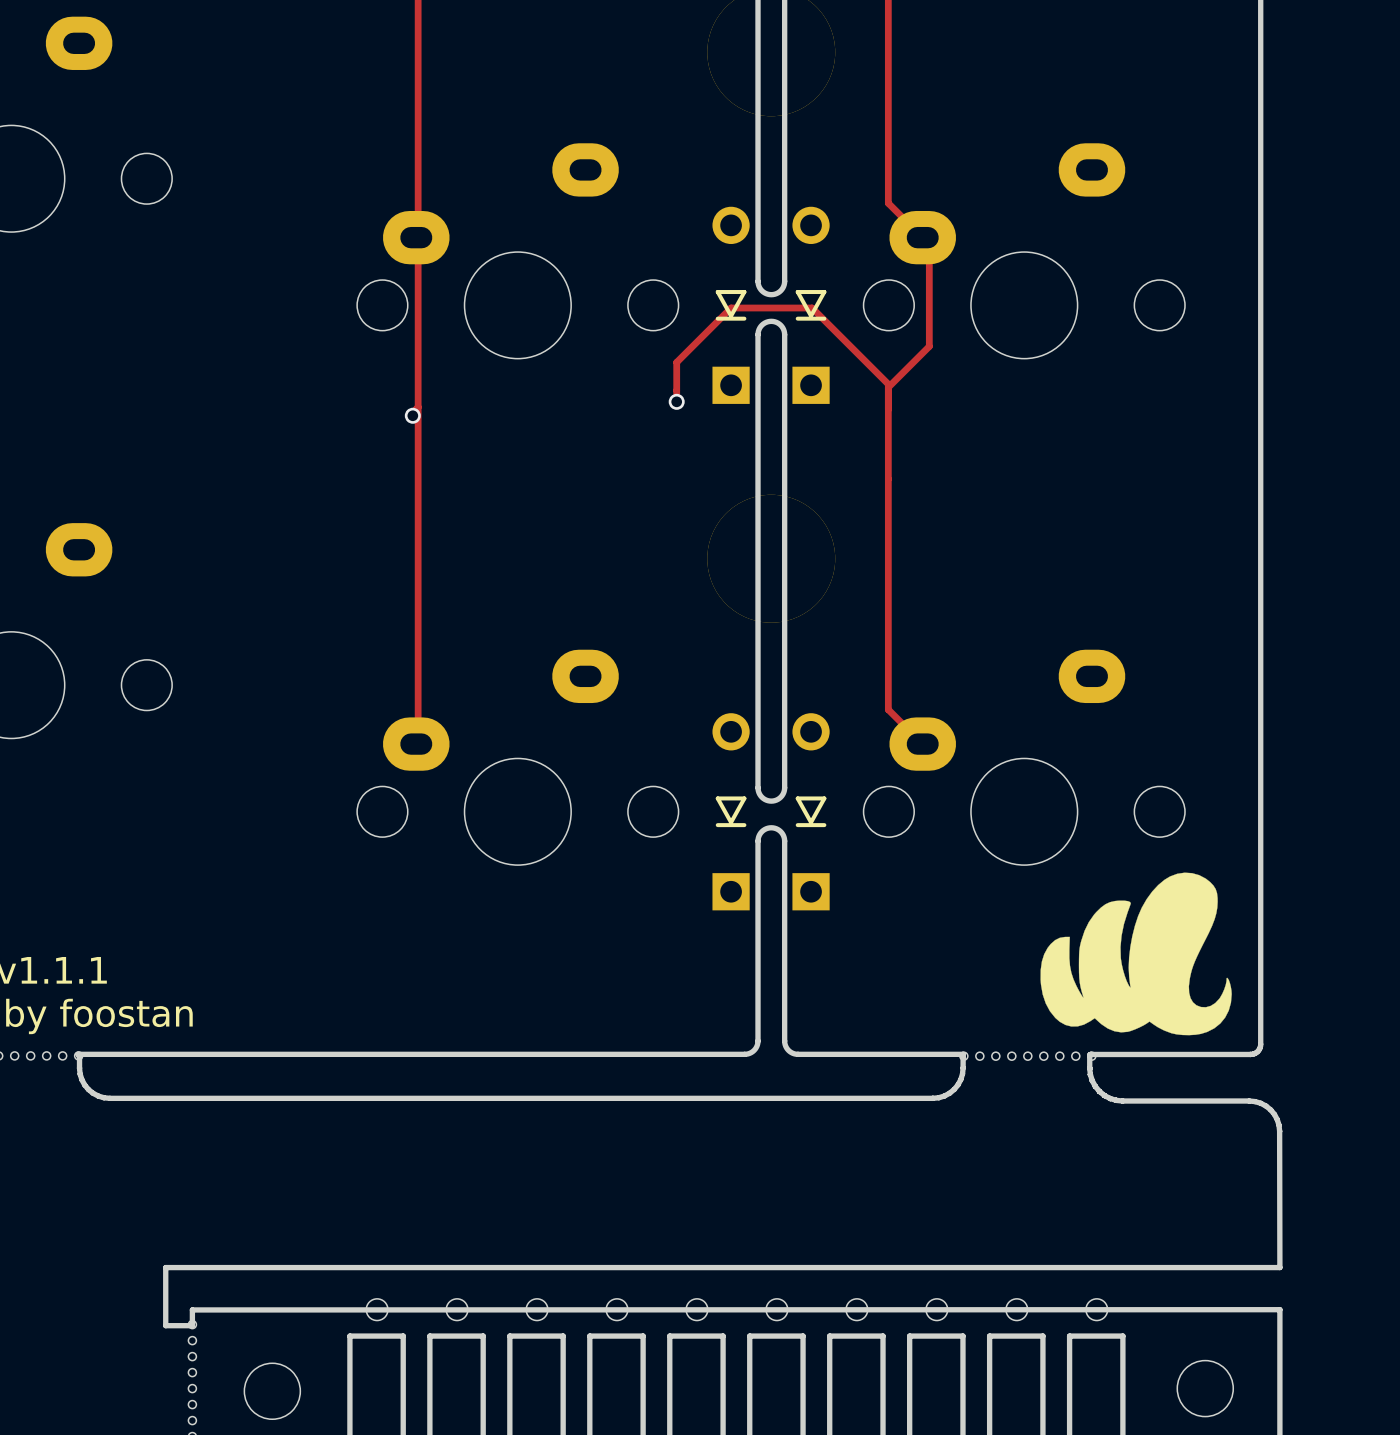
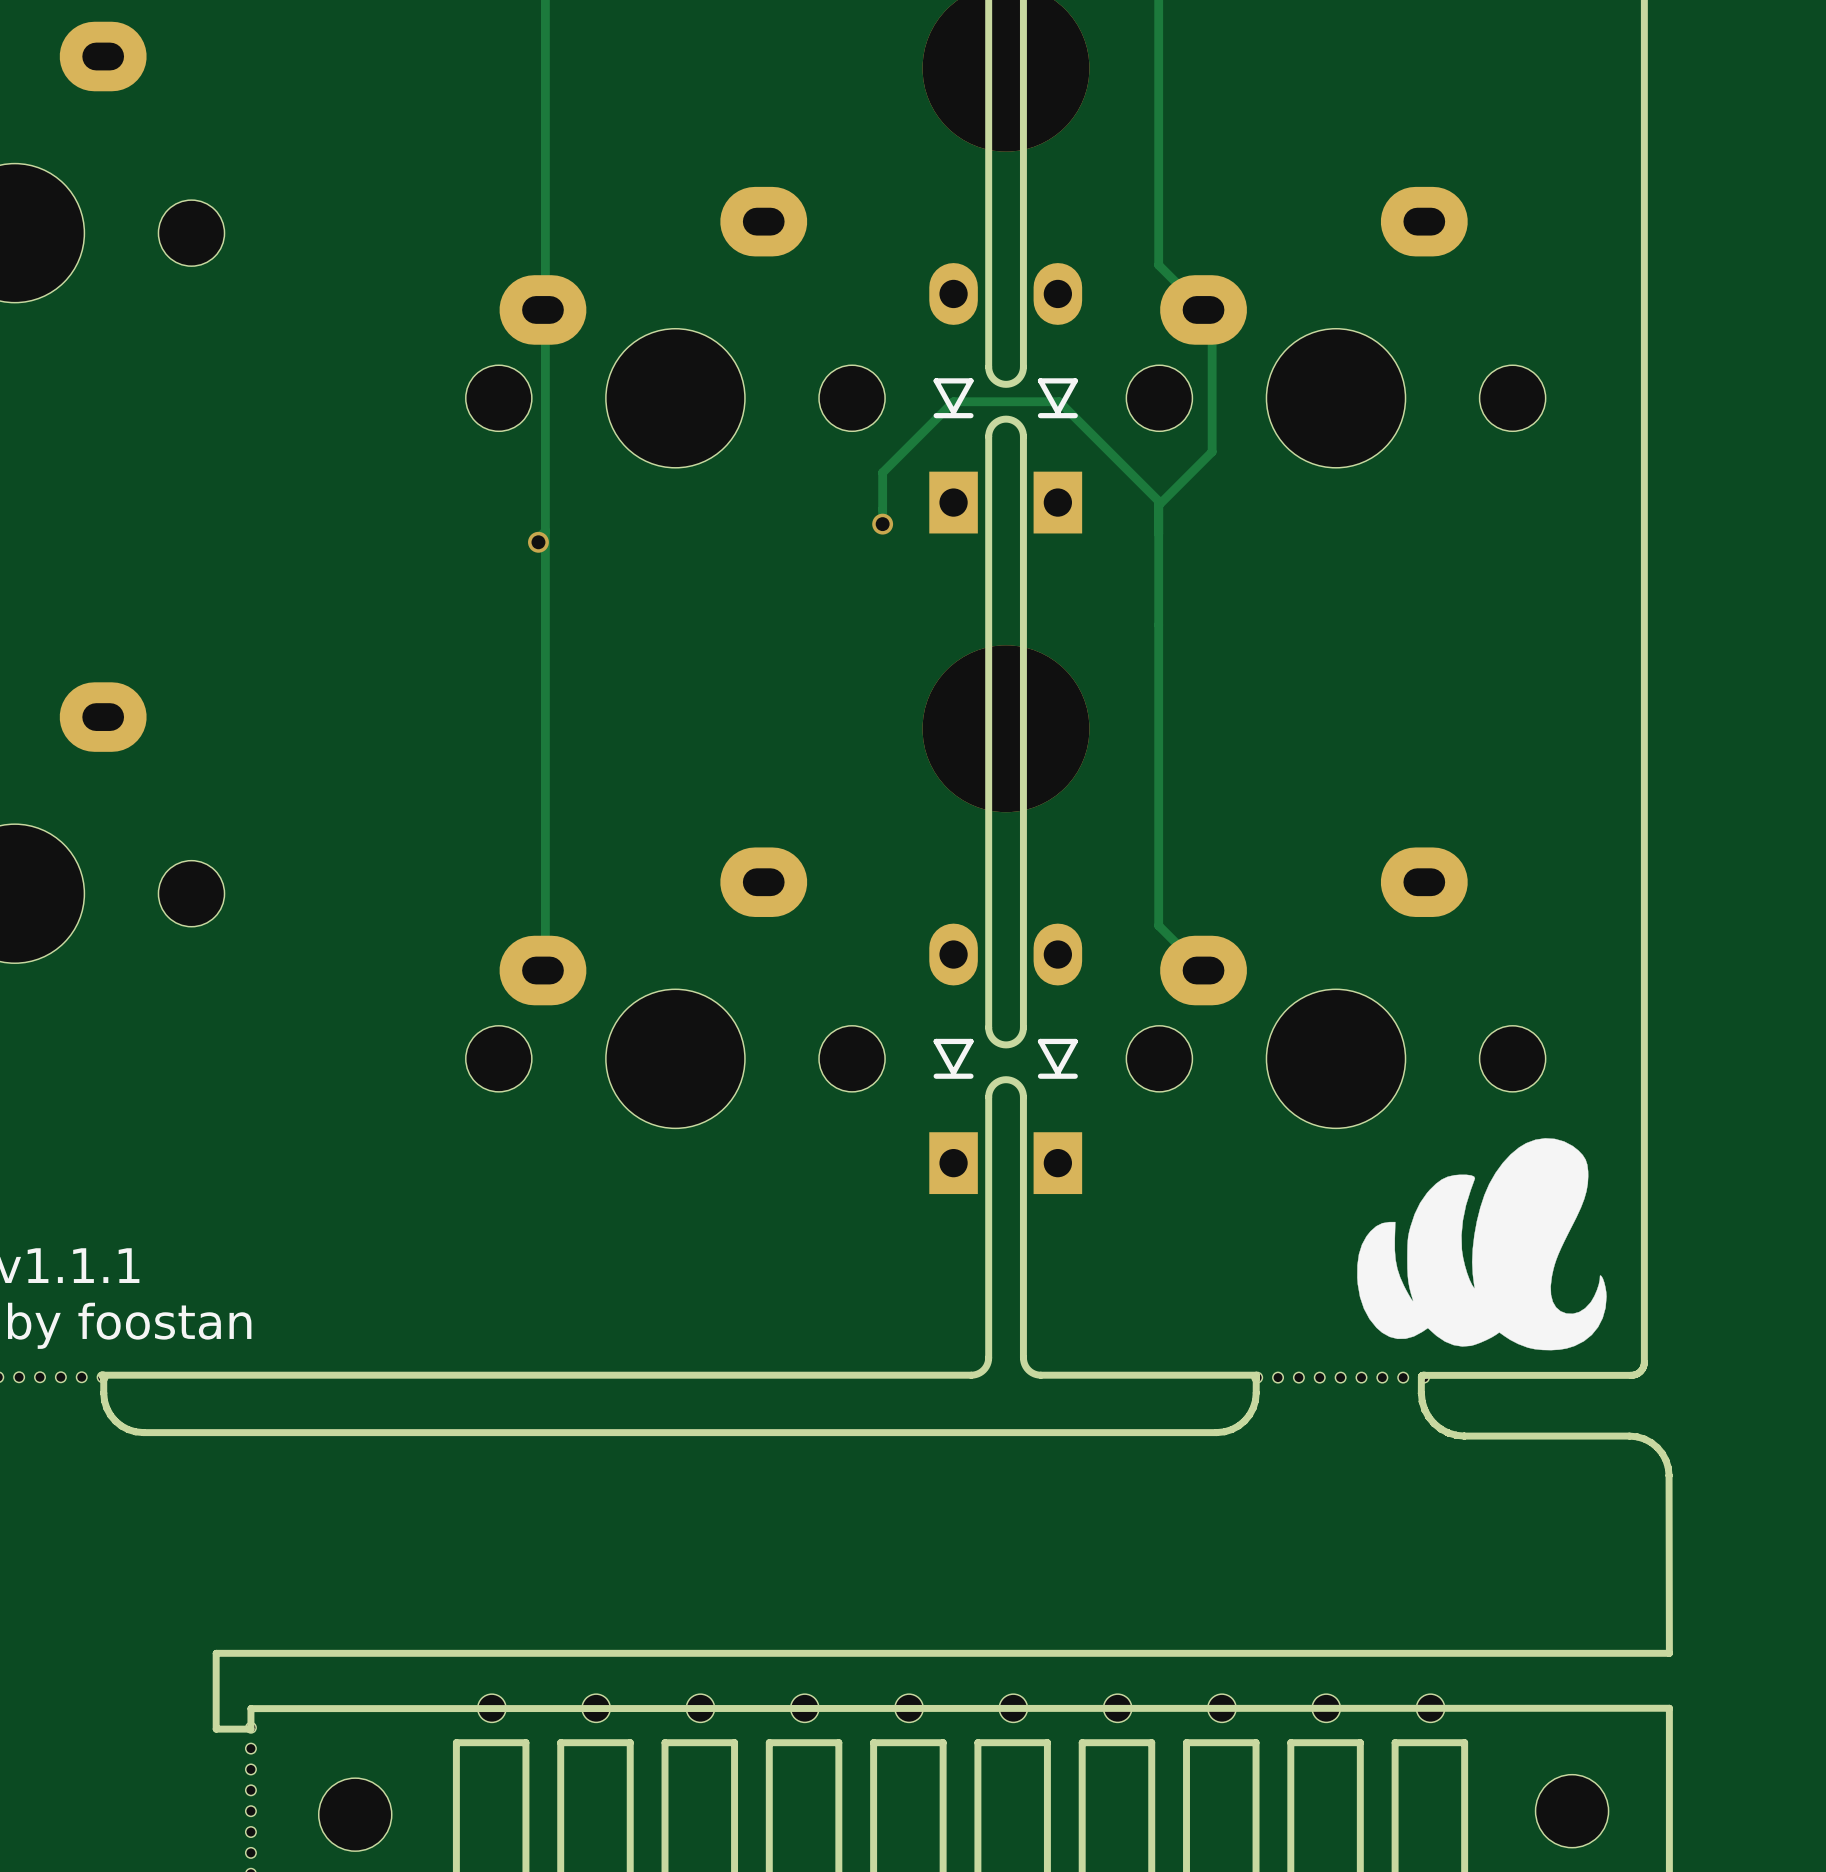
part footprint: [712, 206, 750, 404] -> [929, 263, 978, 534]
part footprint: [792, 206, 830, 404] -> [1033, 263, 1083, 534]
part footprint: [712, 713, 750, 911] -> [929, 923, 978, 1195]
part footprint: [792, 713, 830, 911] -> [1033, 923, 1083, 1195]

